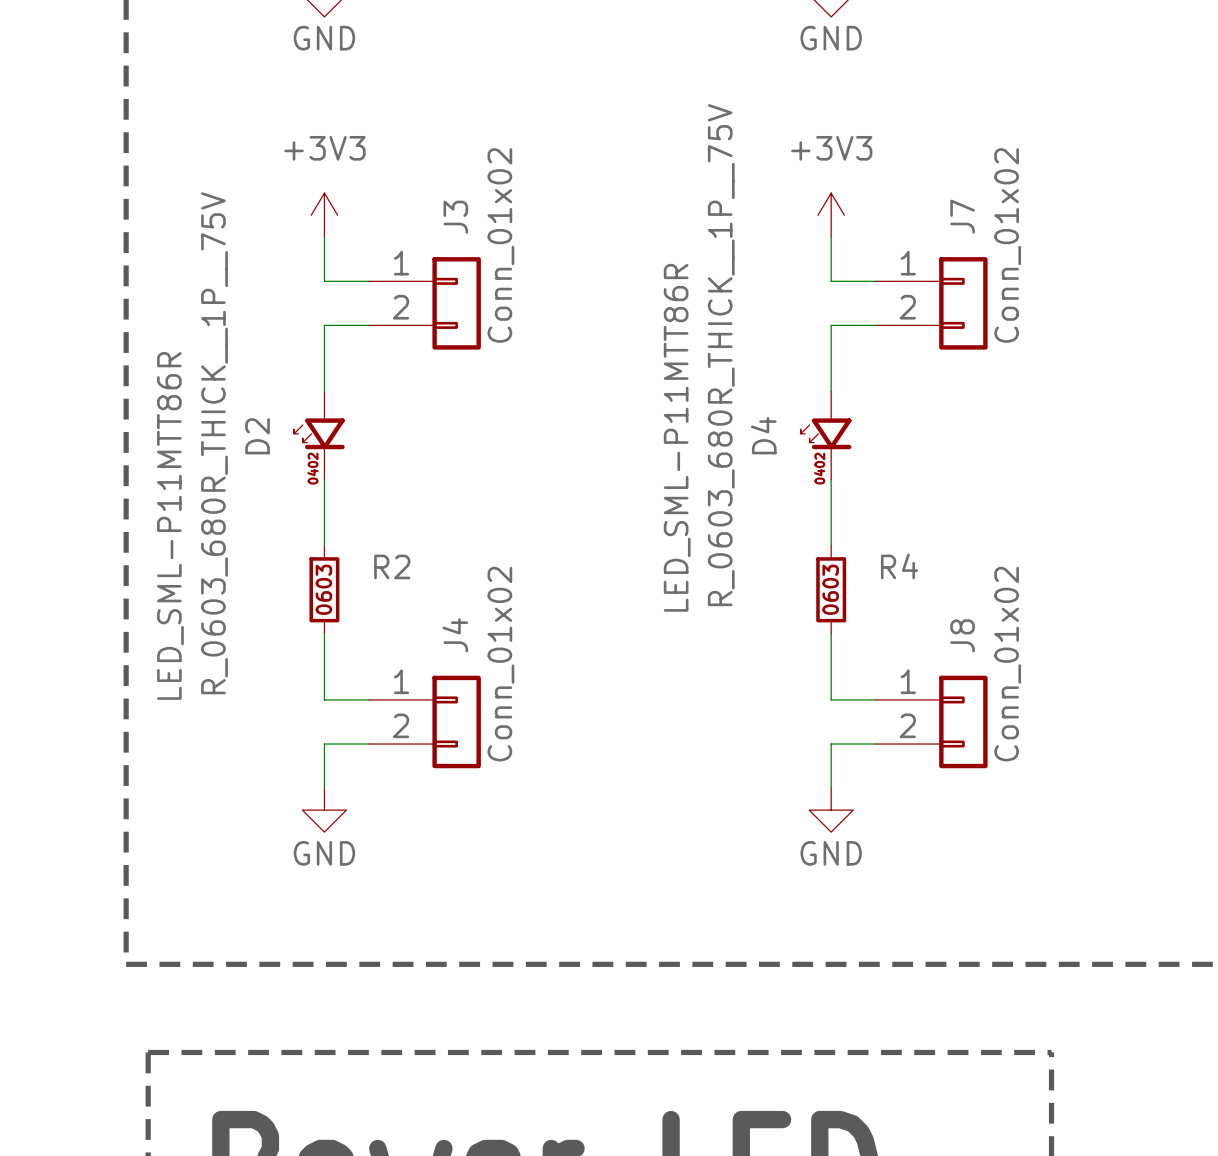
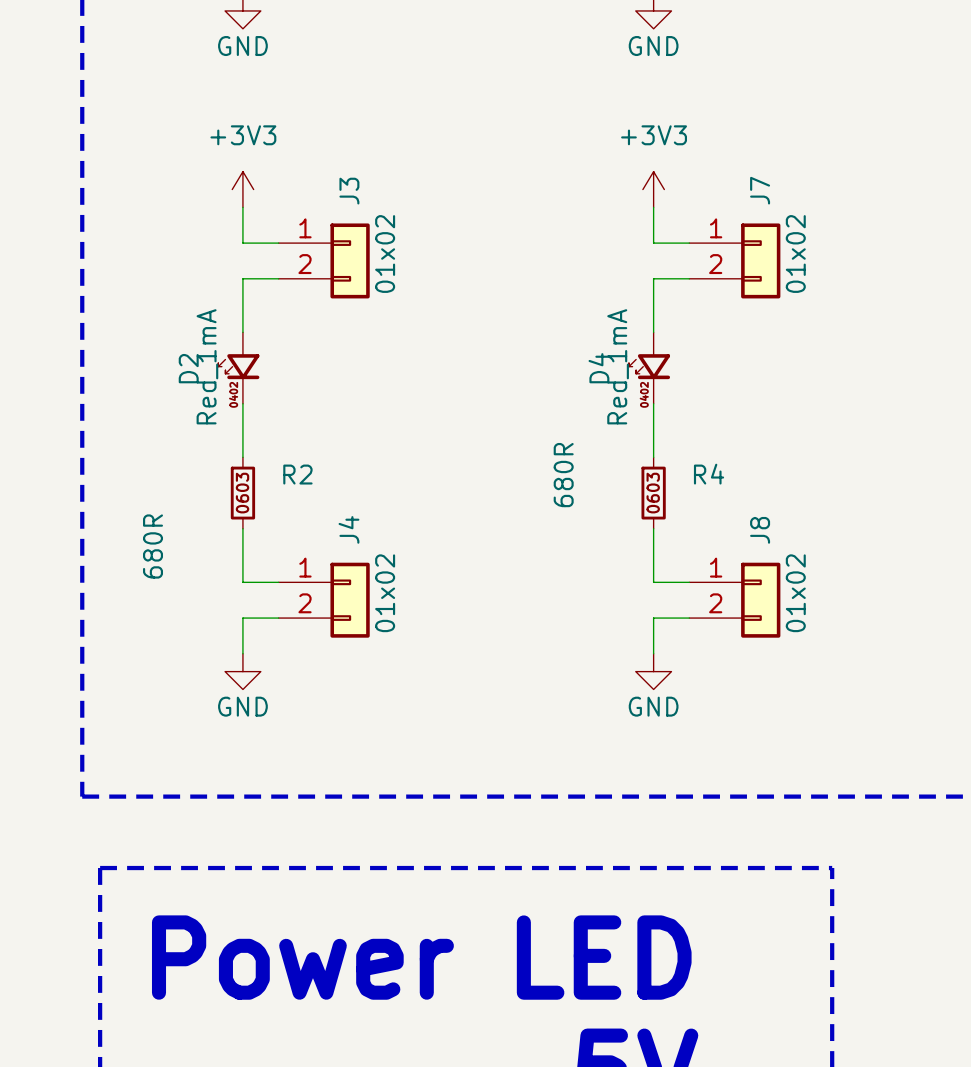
J3 value: Conn_01x02 (500, 245) -> 01x02 (385, 254)
J7 value: Conn_01x02 (1007, 245) -> 01x02 (795, 254)
R4 value: R_0603_680R_THICK__1P__75V (721, 355) -> 680R (563, 475)
D4 value: LED_SML-P11MTT86R (677, 437) -> Red_1mA (618, 366)
R2 value: R_0603_680R_THICK__1P__75V (214, 443) -> 680R (153, 546)
D2 value: LED_SML-P11MTT86R (170, 525) -> Red_1mA (207, 366)
J4 value: Conn_01x02 (500, 664) -> 01x02 (385, 593)
J8 value: Conn_01x02 (1007, 664) -> 01x02 (795, 593)

